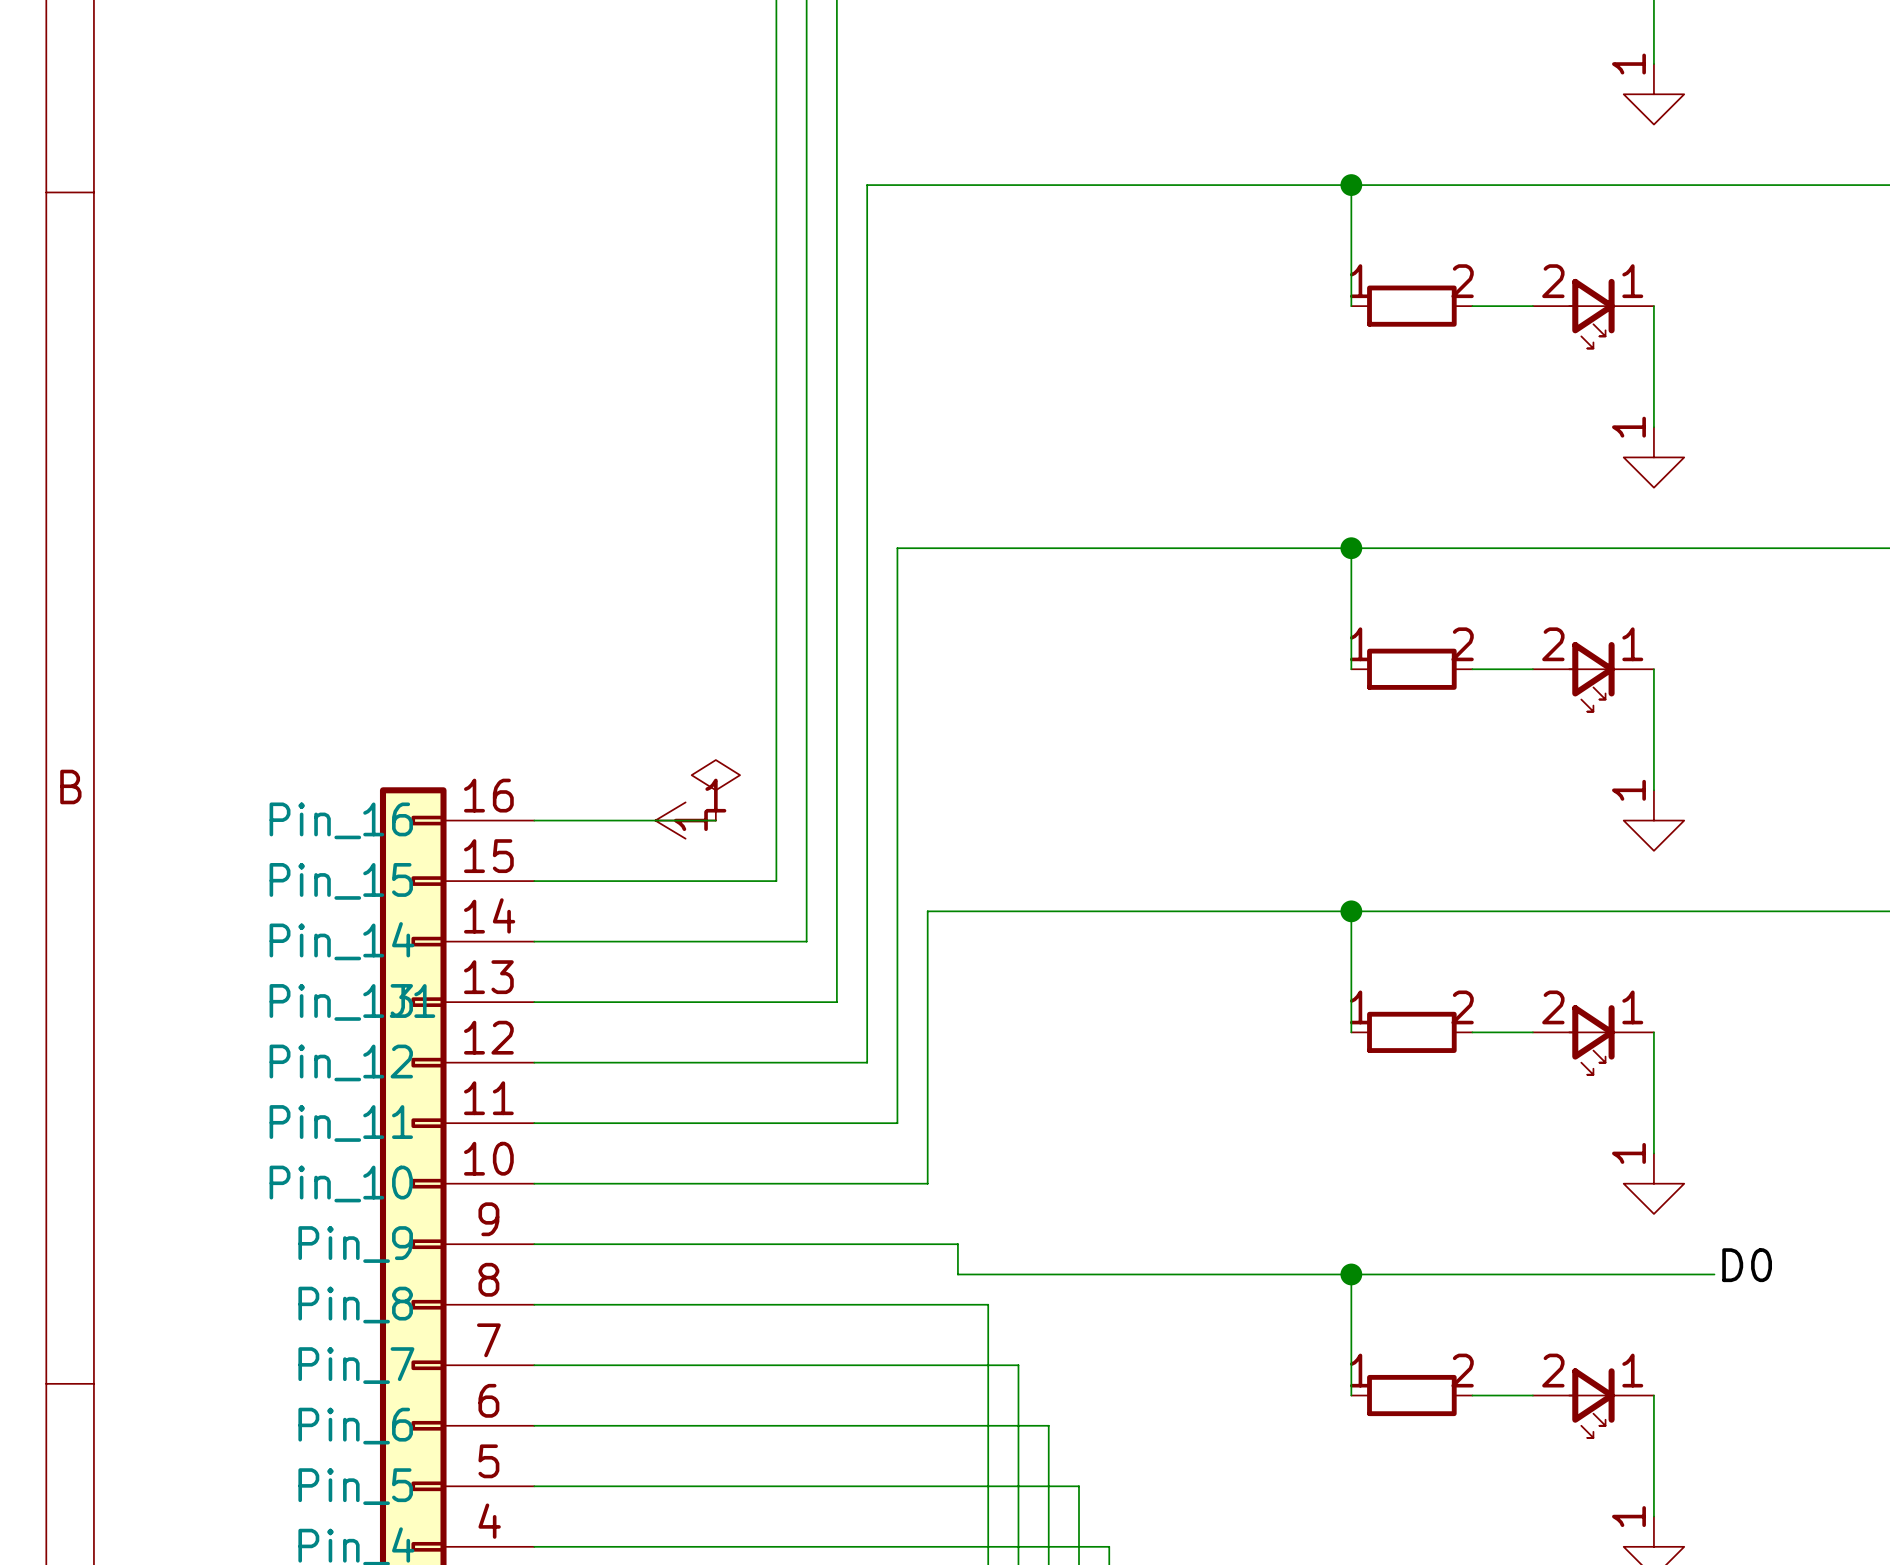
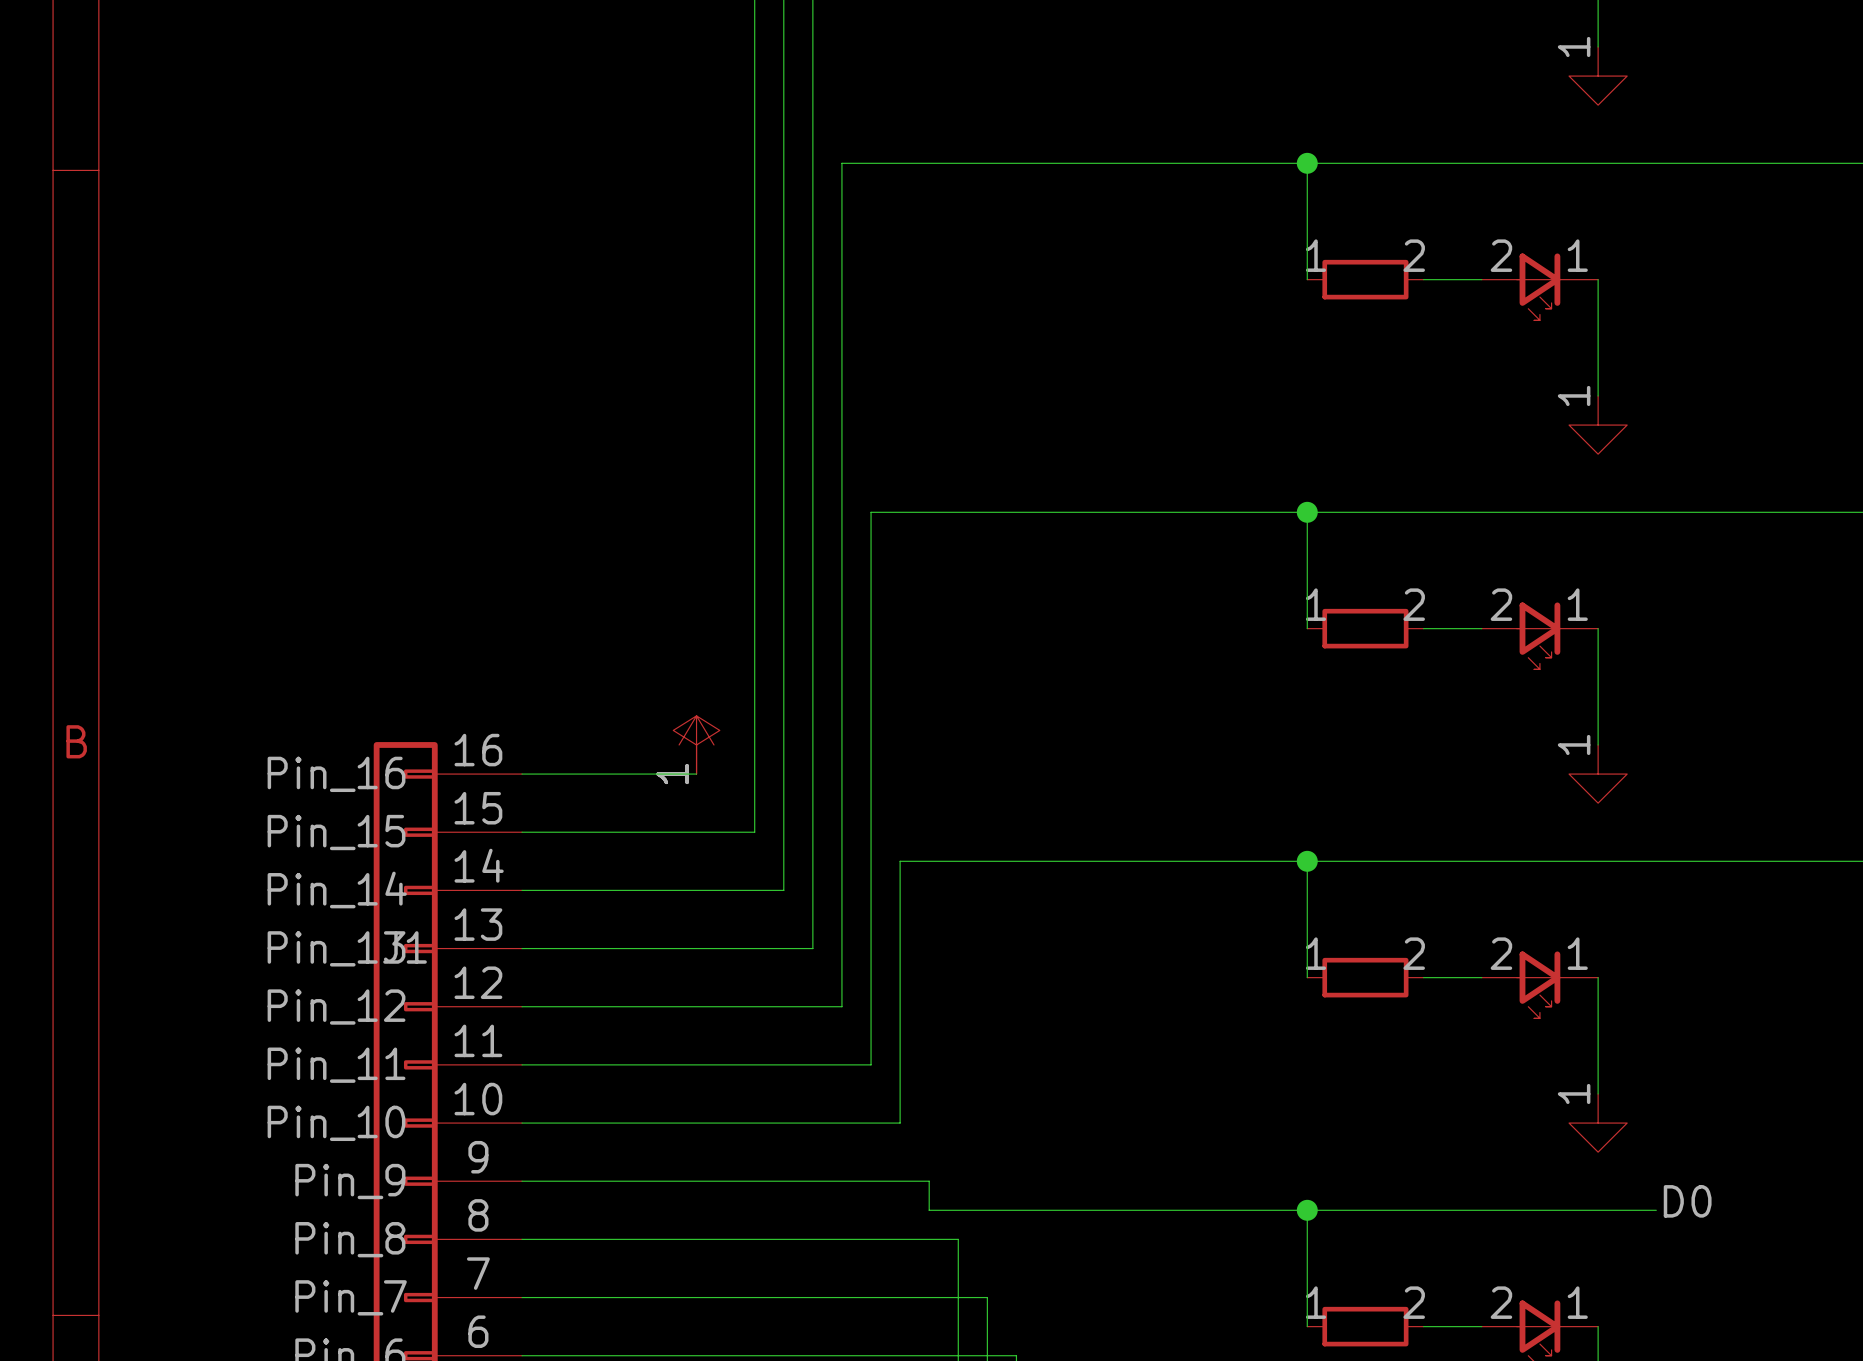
power symbol rotation: 0° (685, 820) -> 90° clockwise (696, 744)
power symbol position: (685, 820) -> (696, 744)

